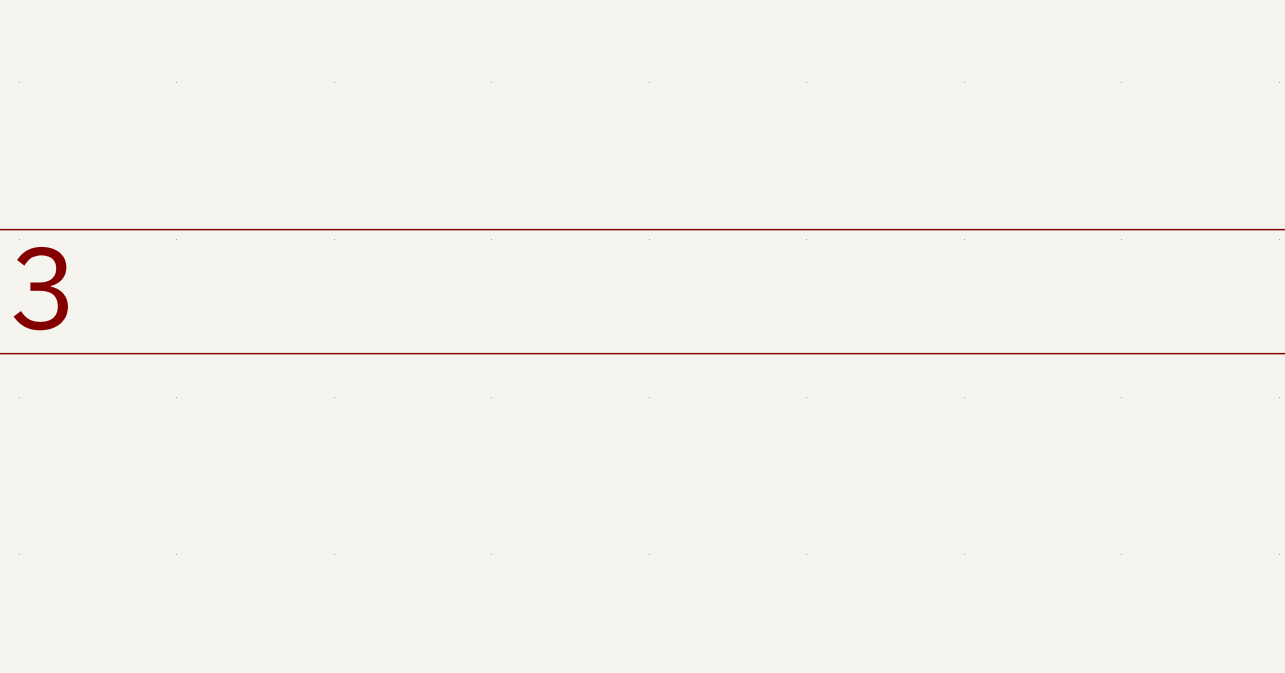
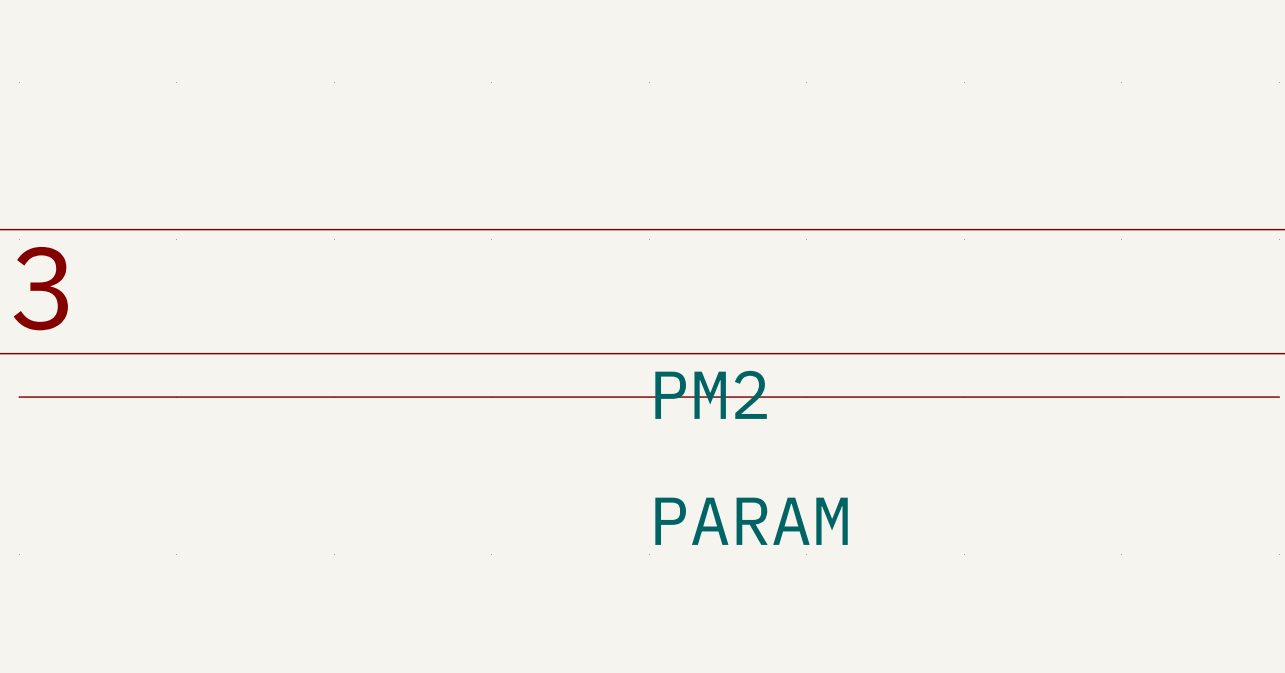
PM2: none -> PARAM (649, 397)

